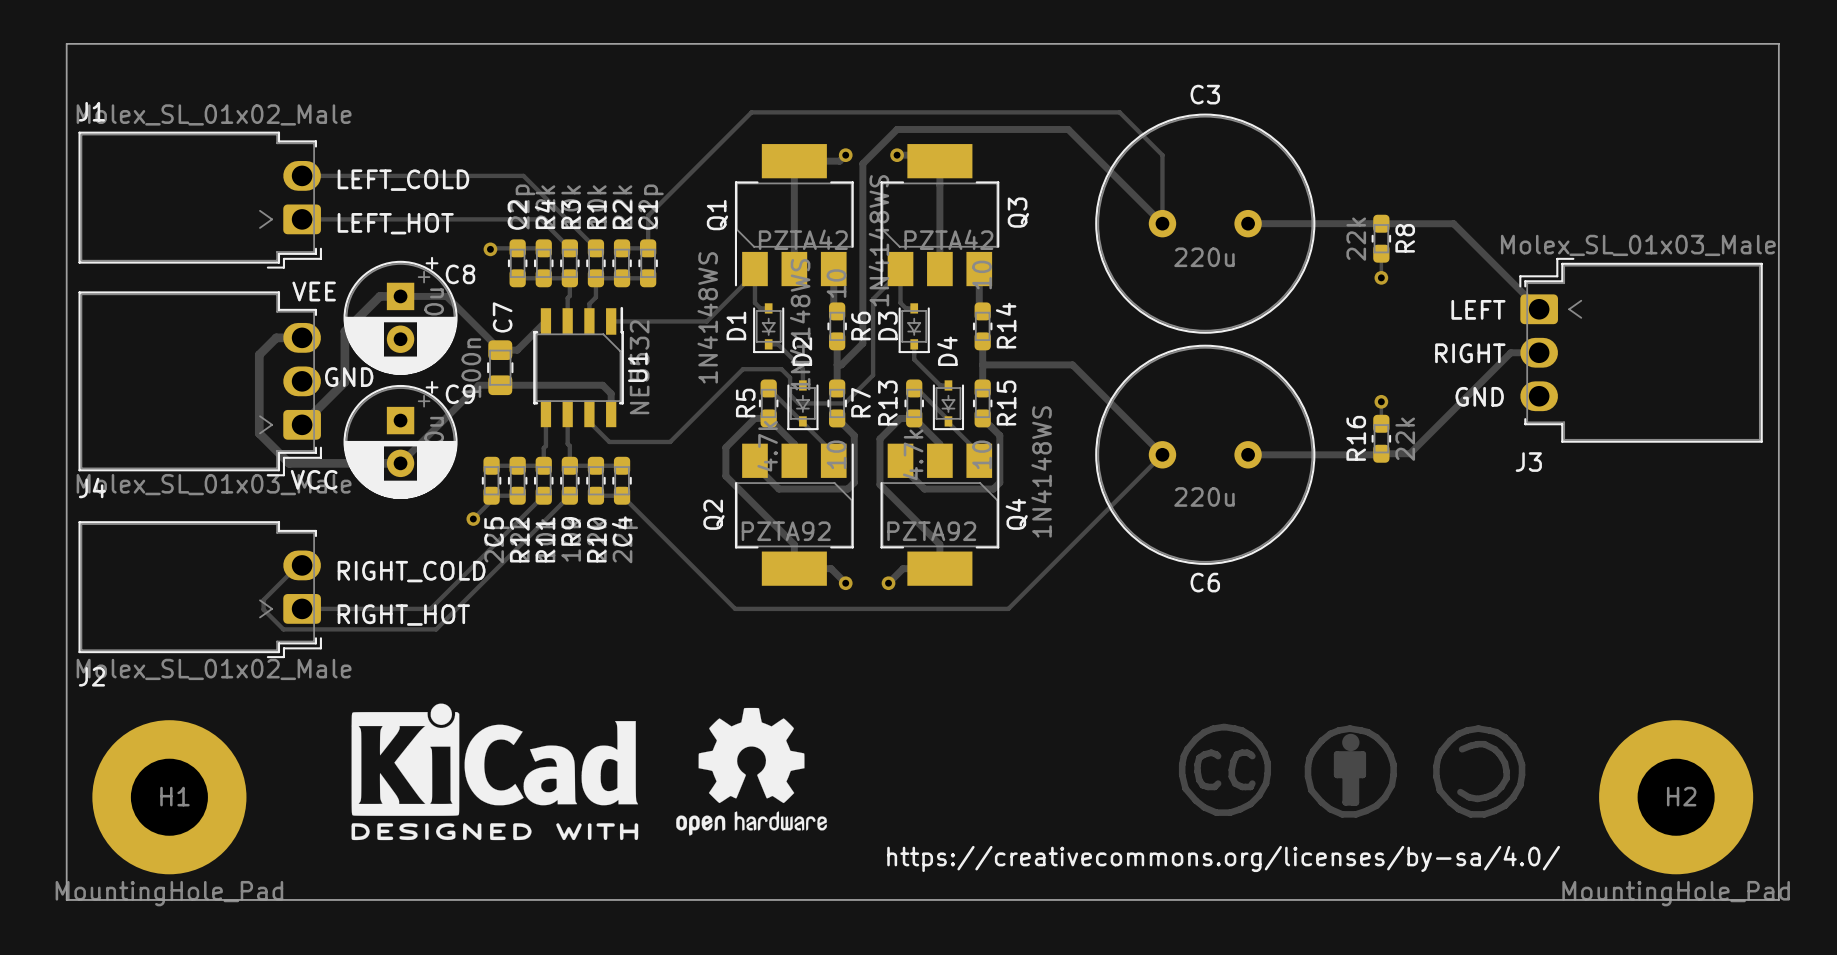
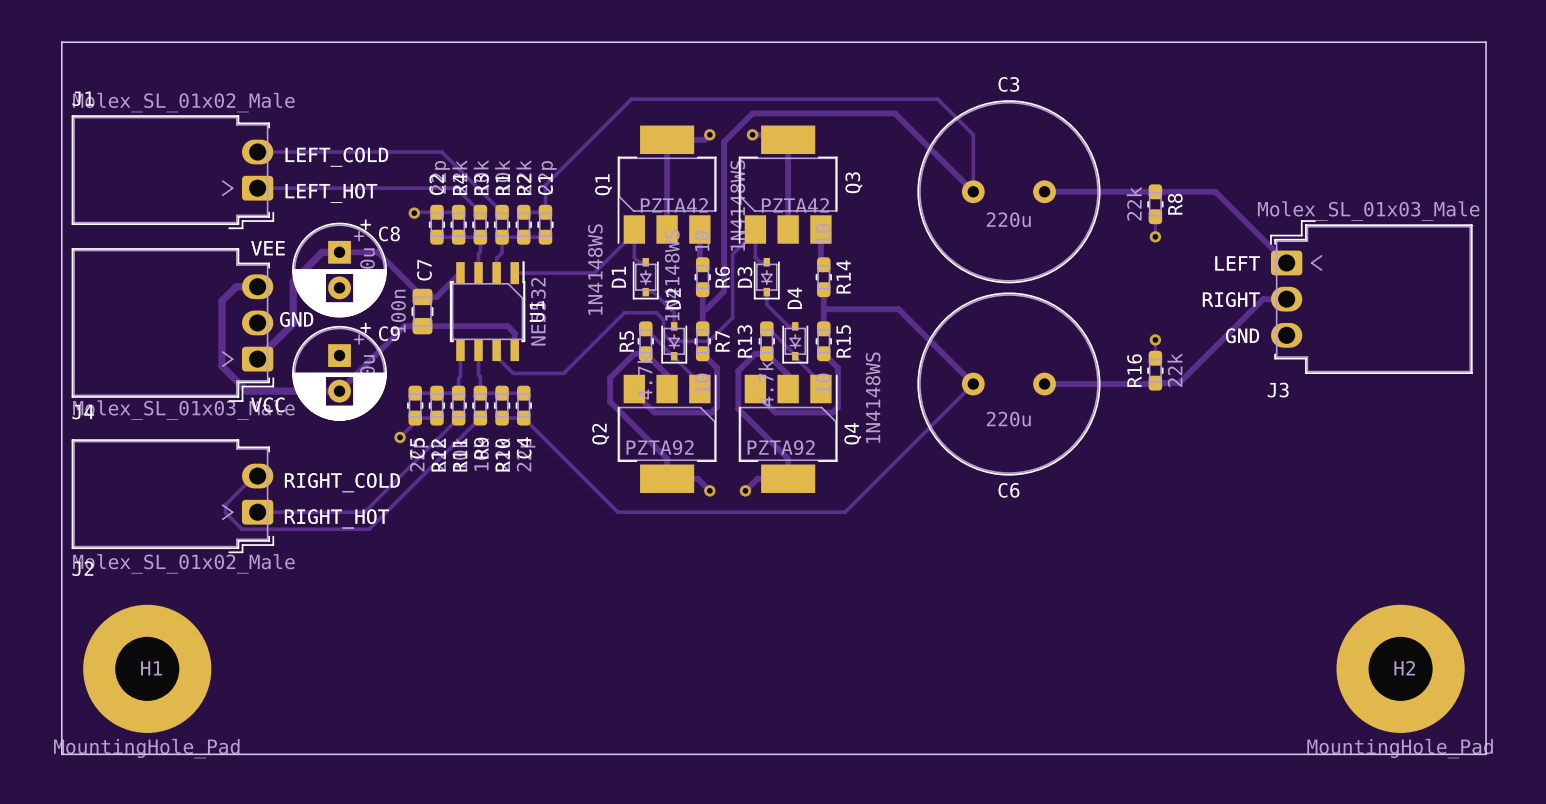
drawing: [351, 703, 639, 841] -> none
drawing: [676, 707, 827, 836] -> none
drawing: [1178, 723, 1272, 816] -> none
drawing: [1304, 725, 1397, 818] -> none
drawing: [1433, 725, 1526, 818] -> none
text: https://creativecommons.org/licenses/by-sa/4.0/ (1223, 858) -> none

